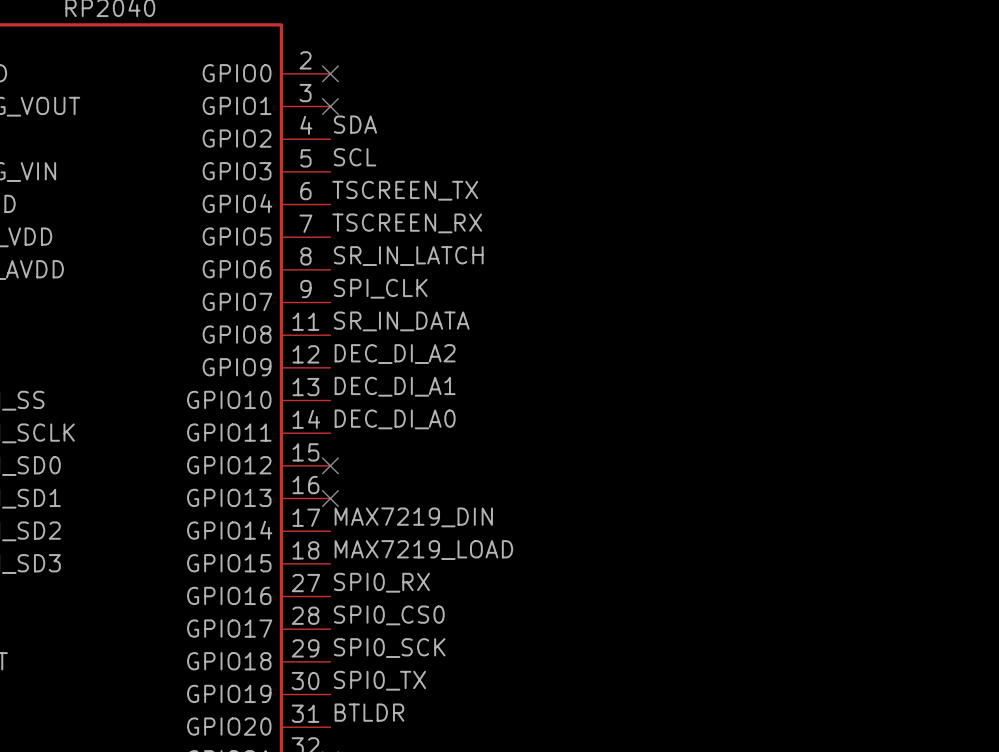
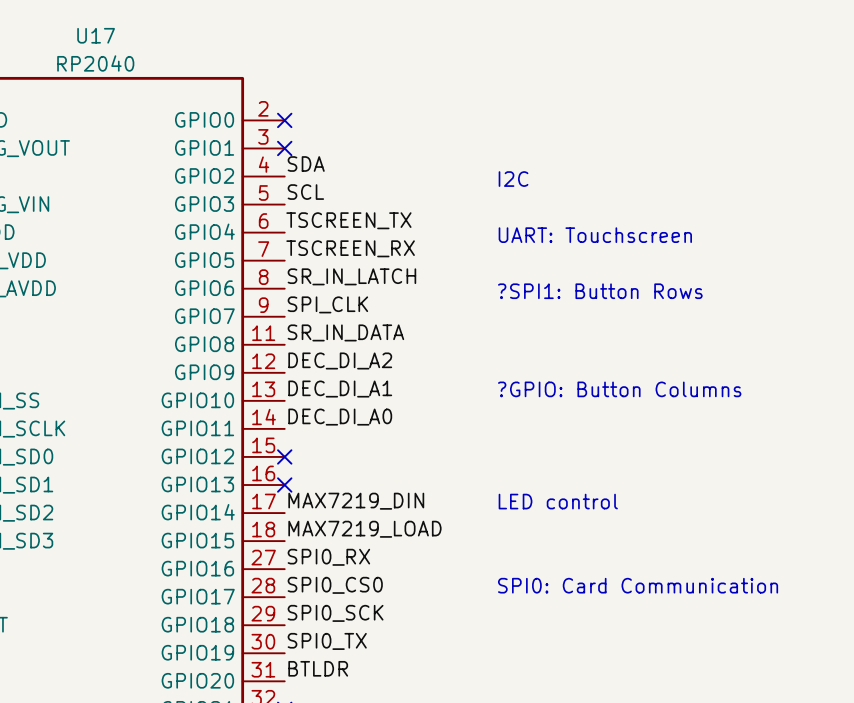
text: none -> I2C (513, 179)
text: none -> UART: Touchscreen (595, 235)
text: none -> ?SPI1: Button Rows (600, 291)
text: none -> ?GPIO: Button Columns (619, 389)
text: none -> LED control (558, 501)
text: none -> SPI0: Card Communication (638, 585)

